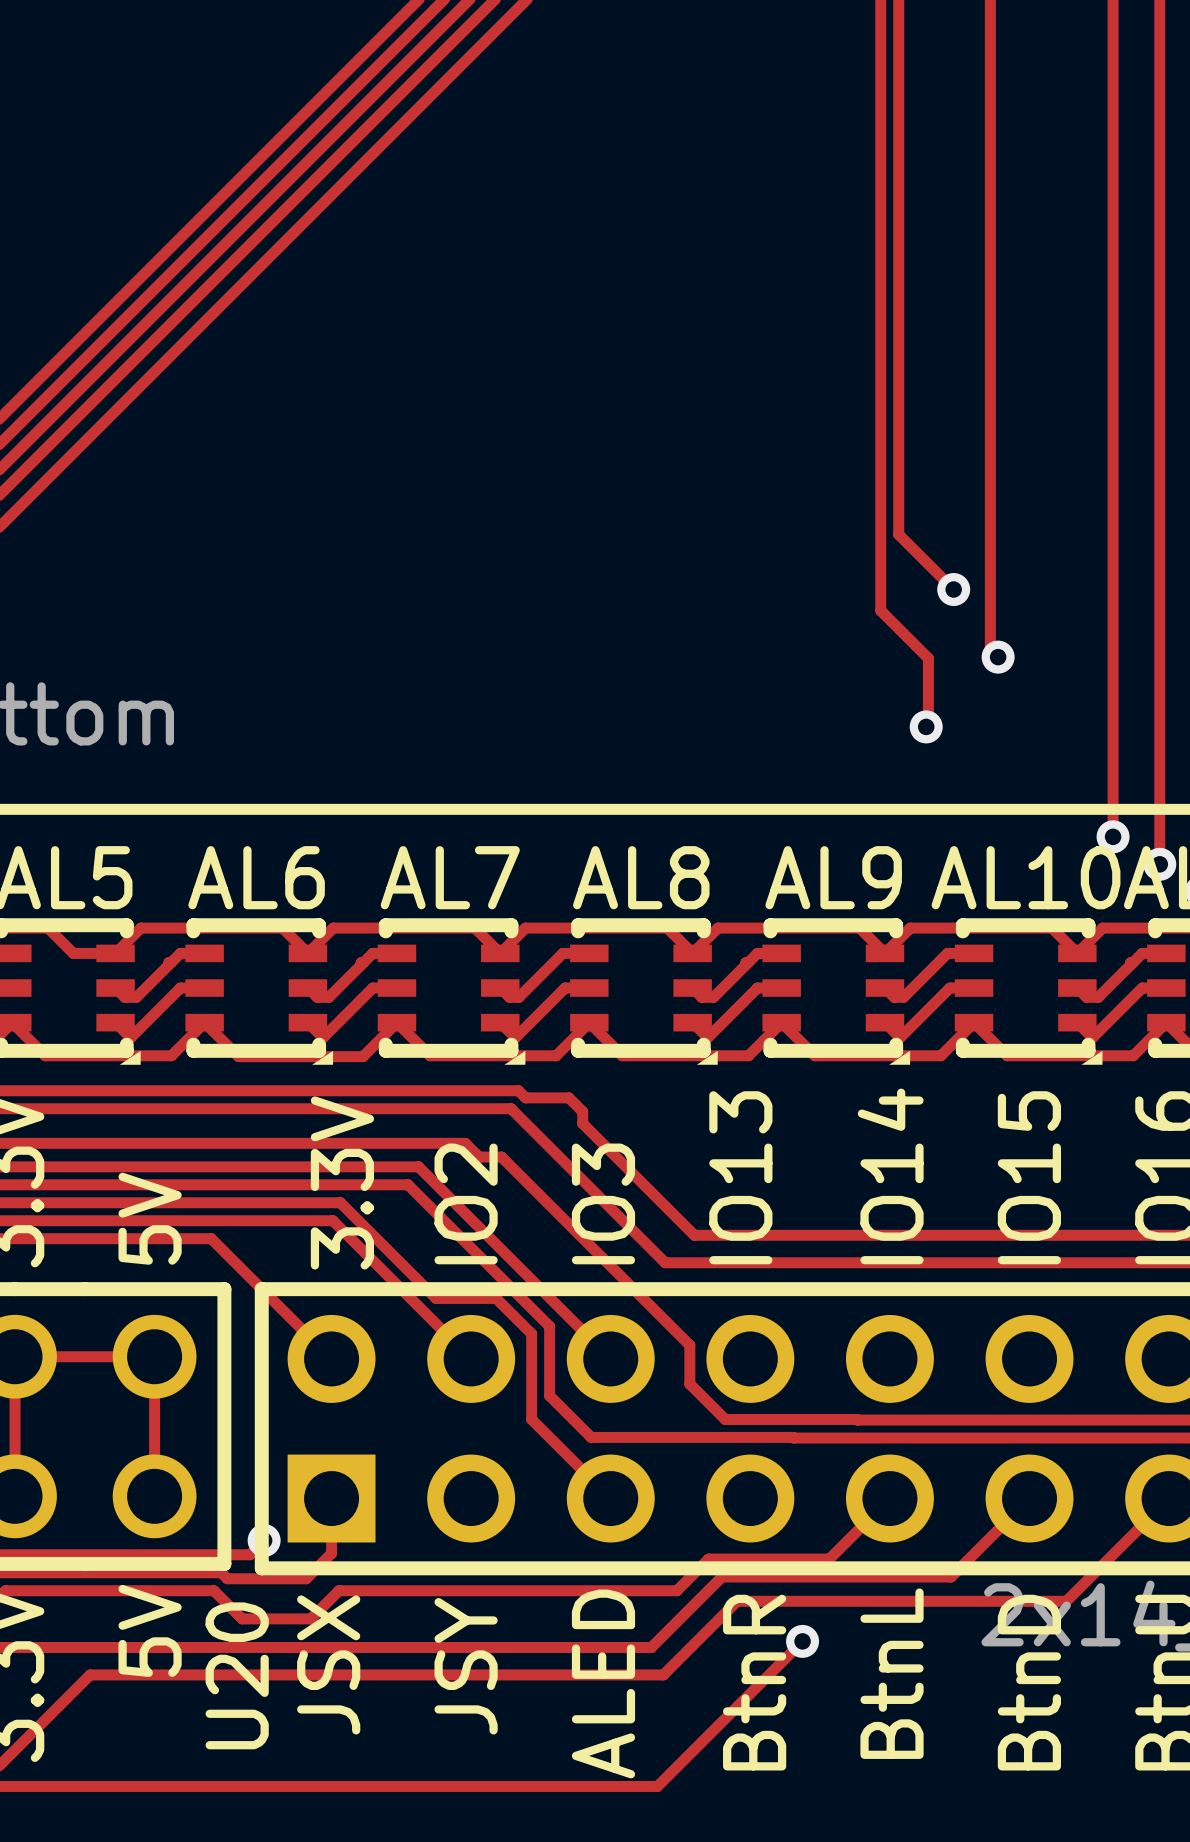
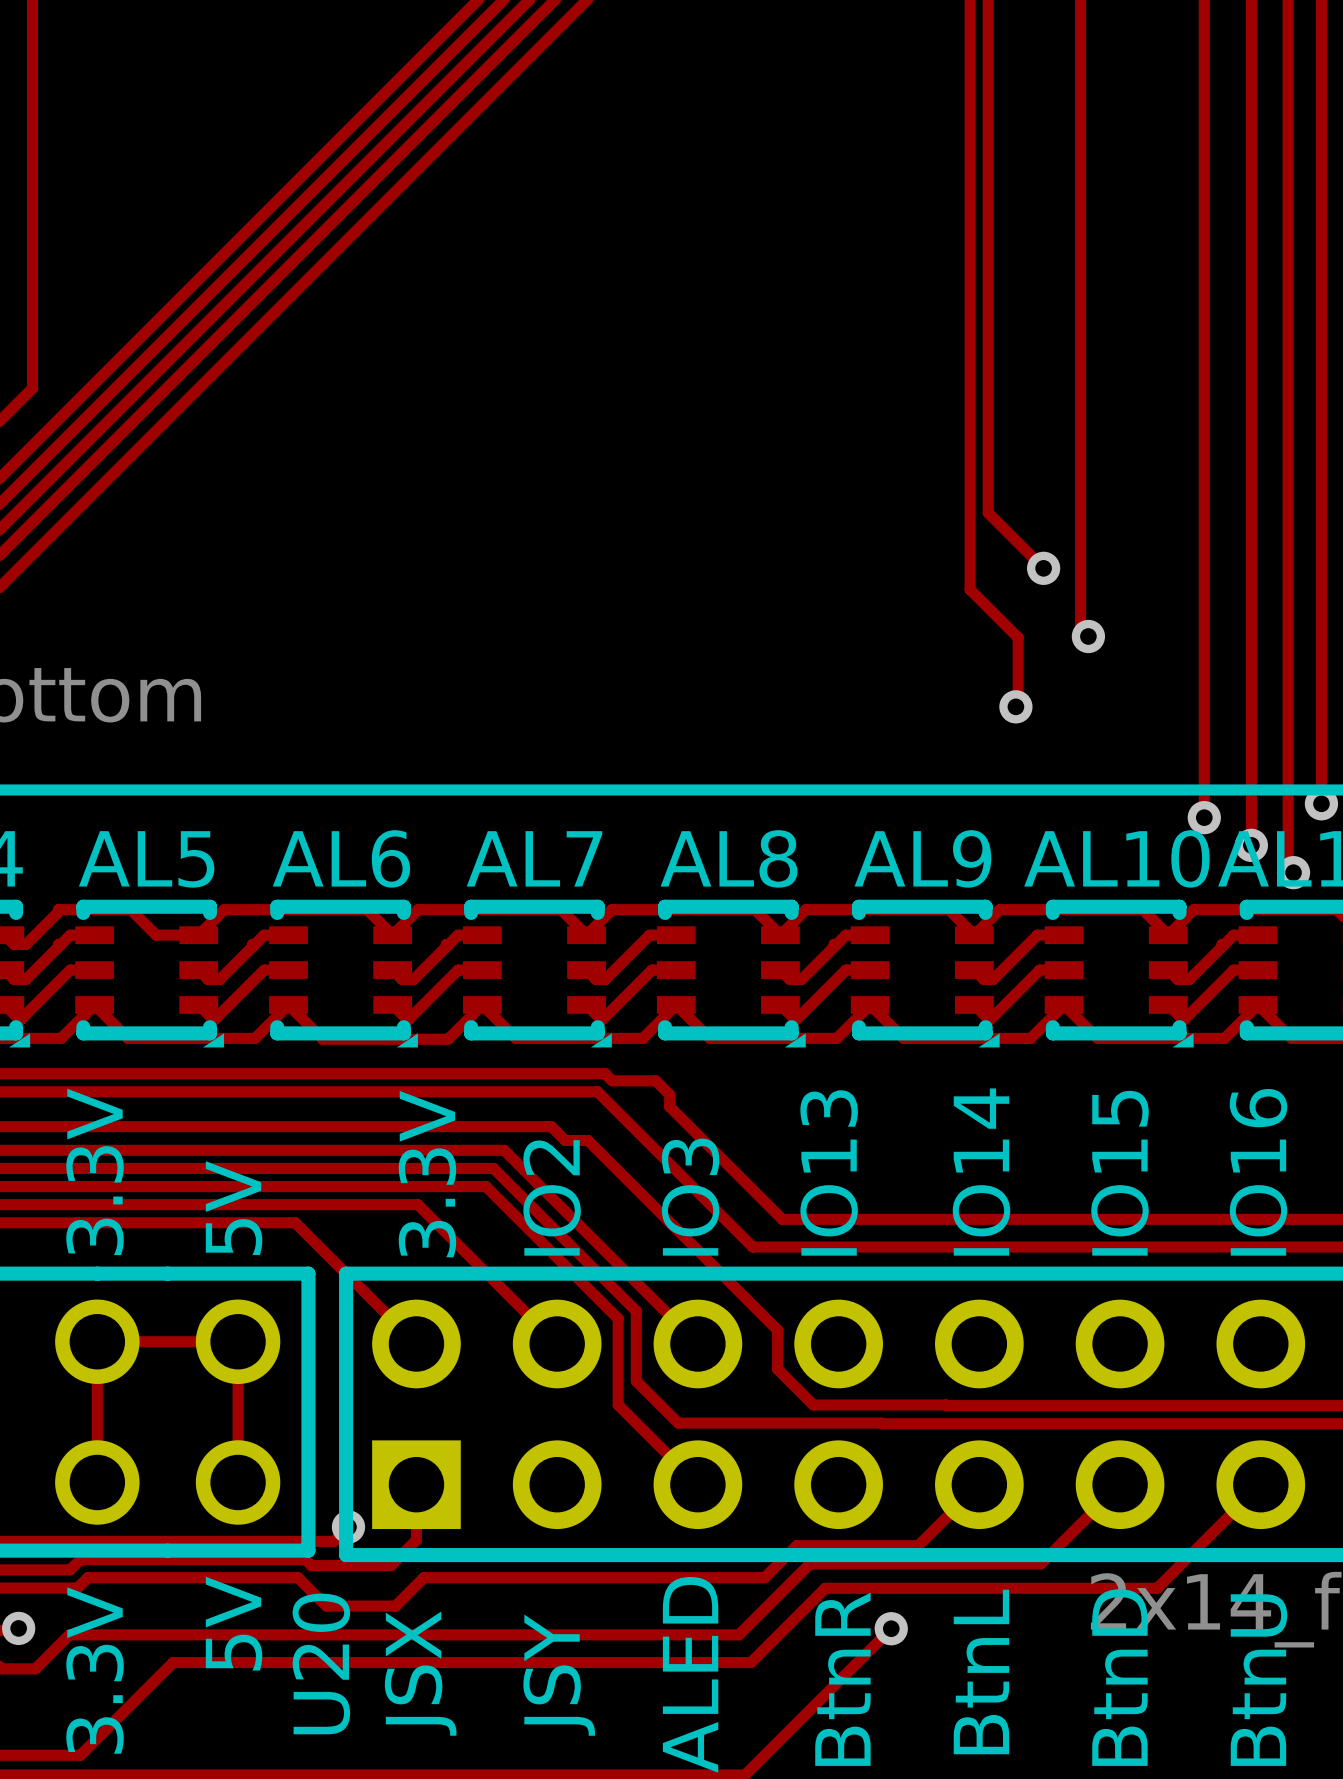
track: (340, 1202) (436, 1298) (496, 1298) -> (425, 1186) (486, 1186) (582, 1282)

